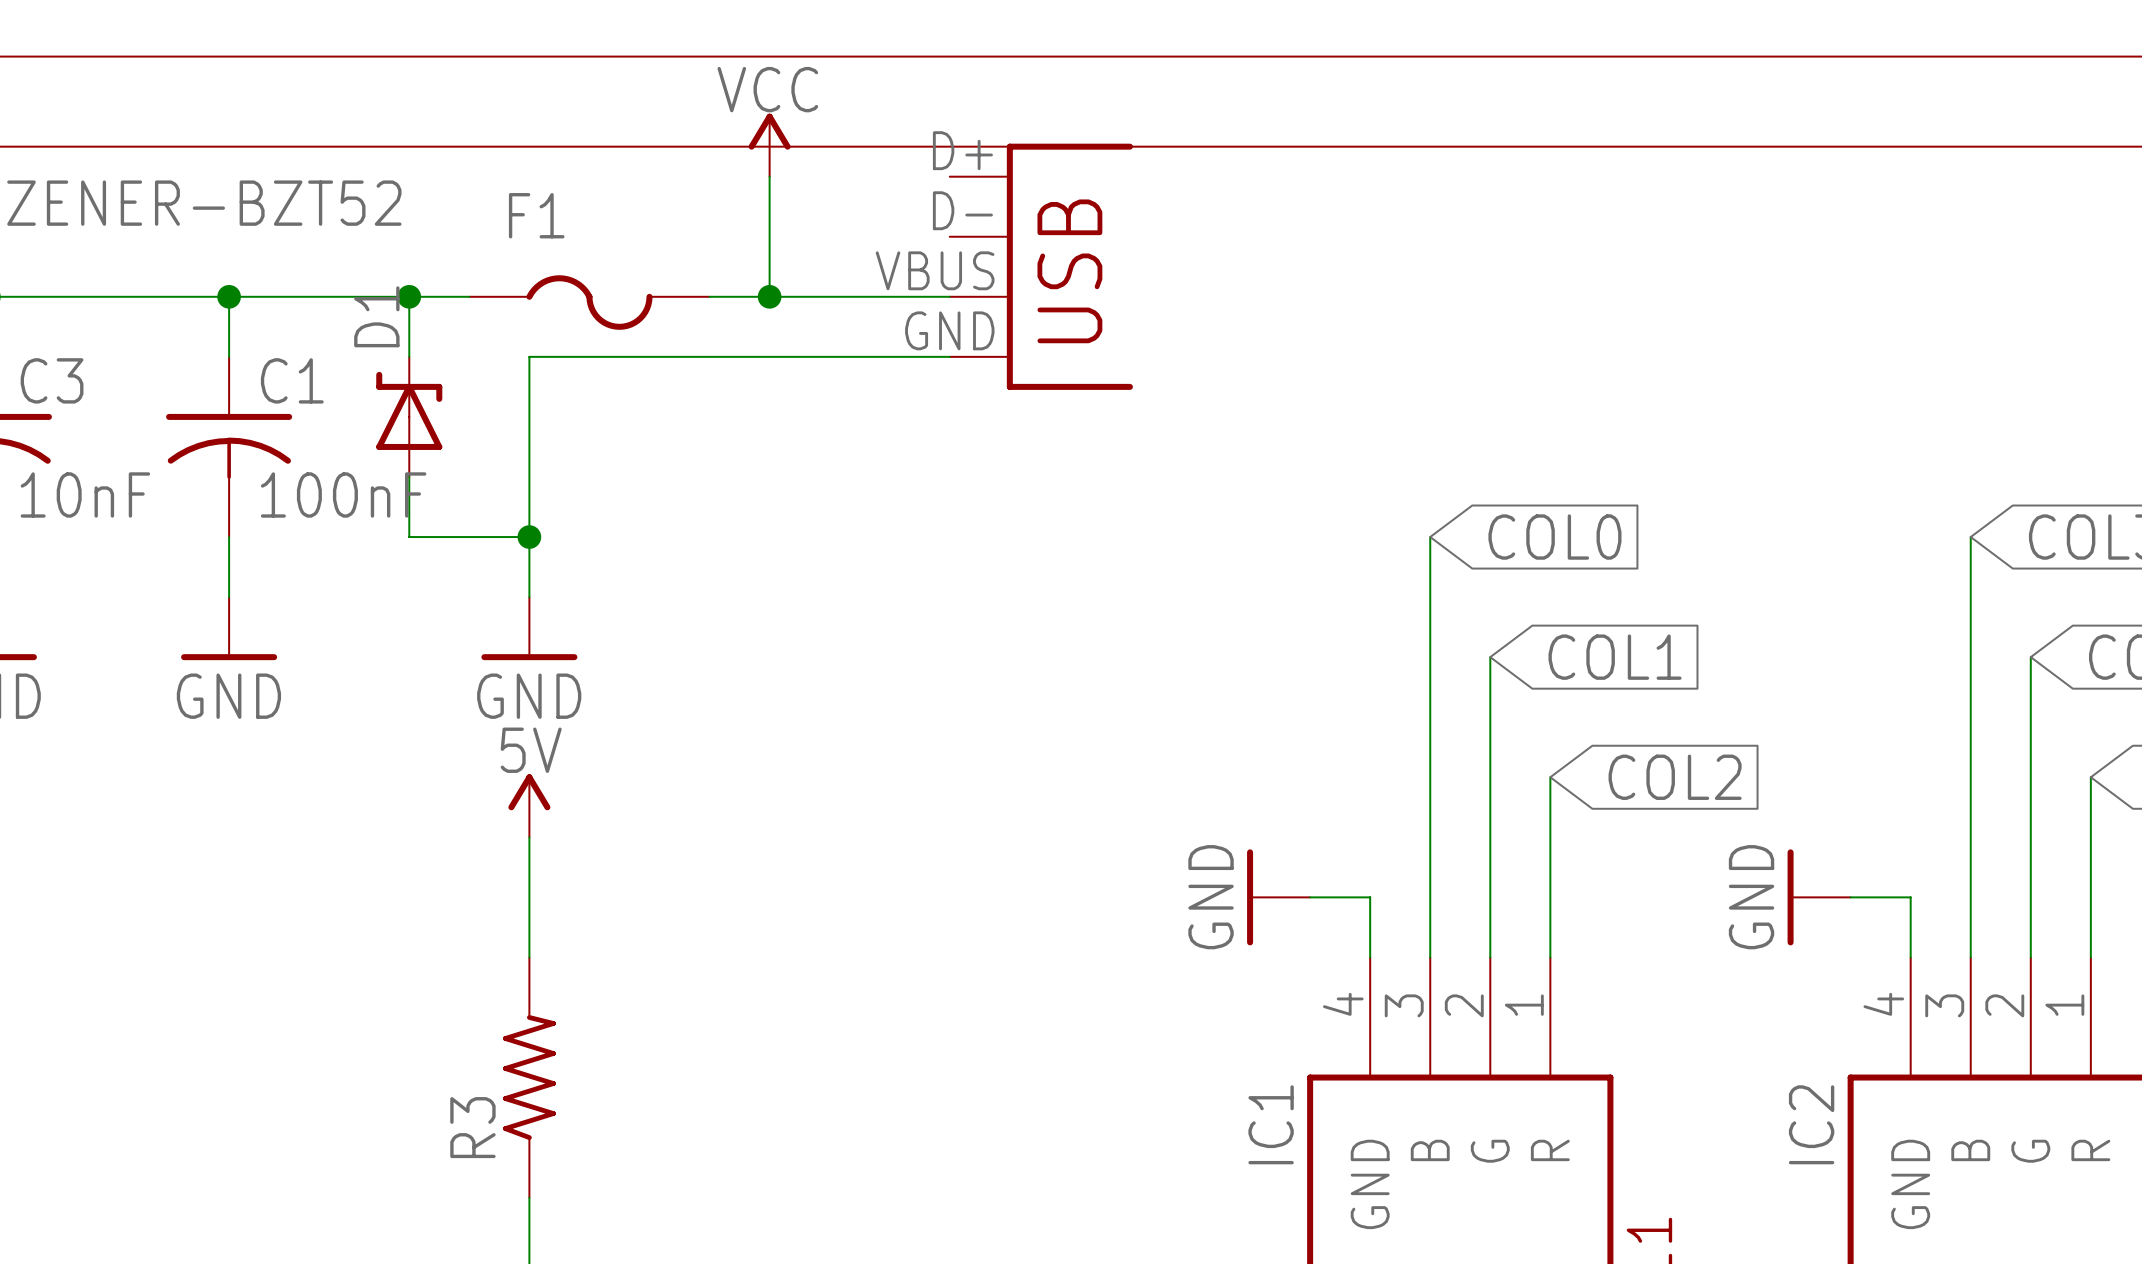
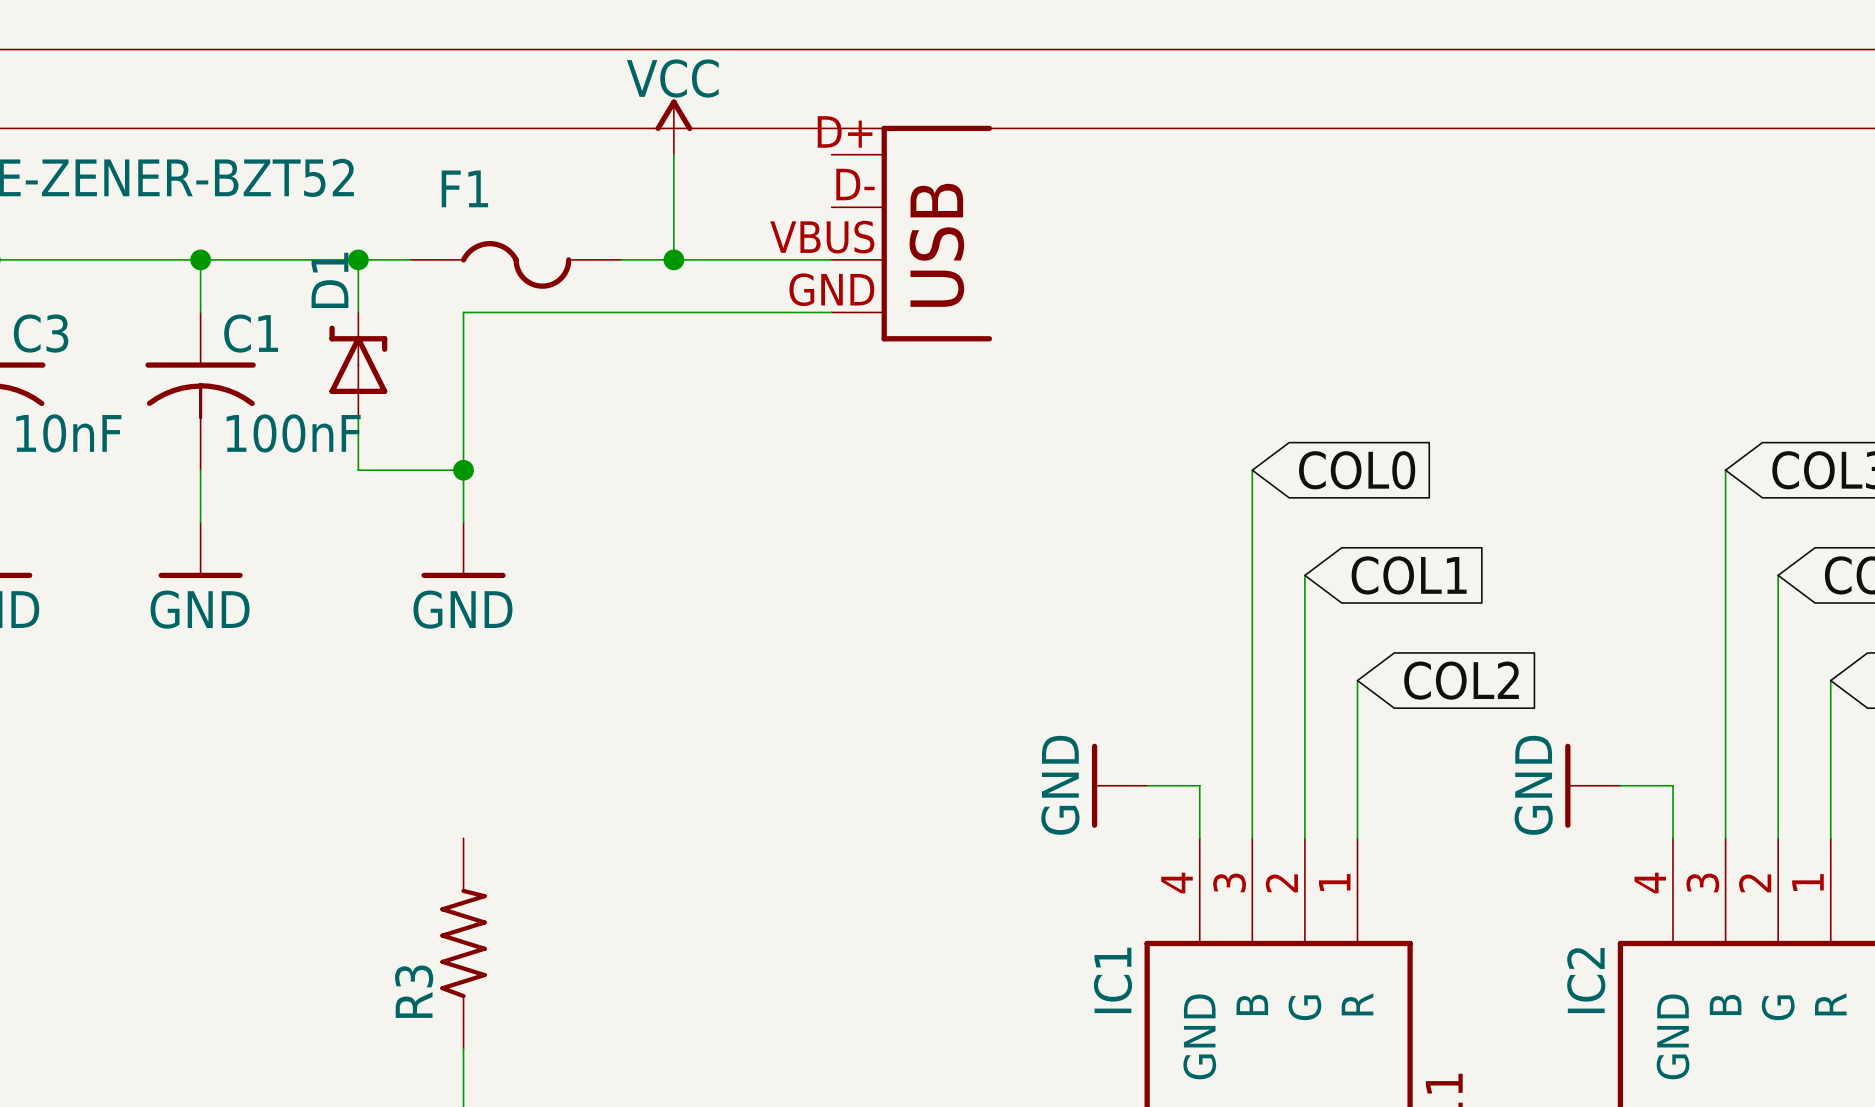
power symbol: 5V (529, 805) -> none
wire: (529, 837) (529, 957) -> none

